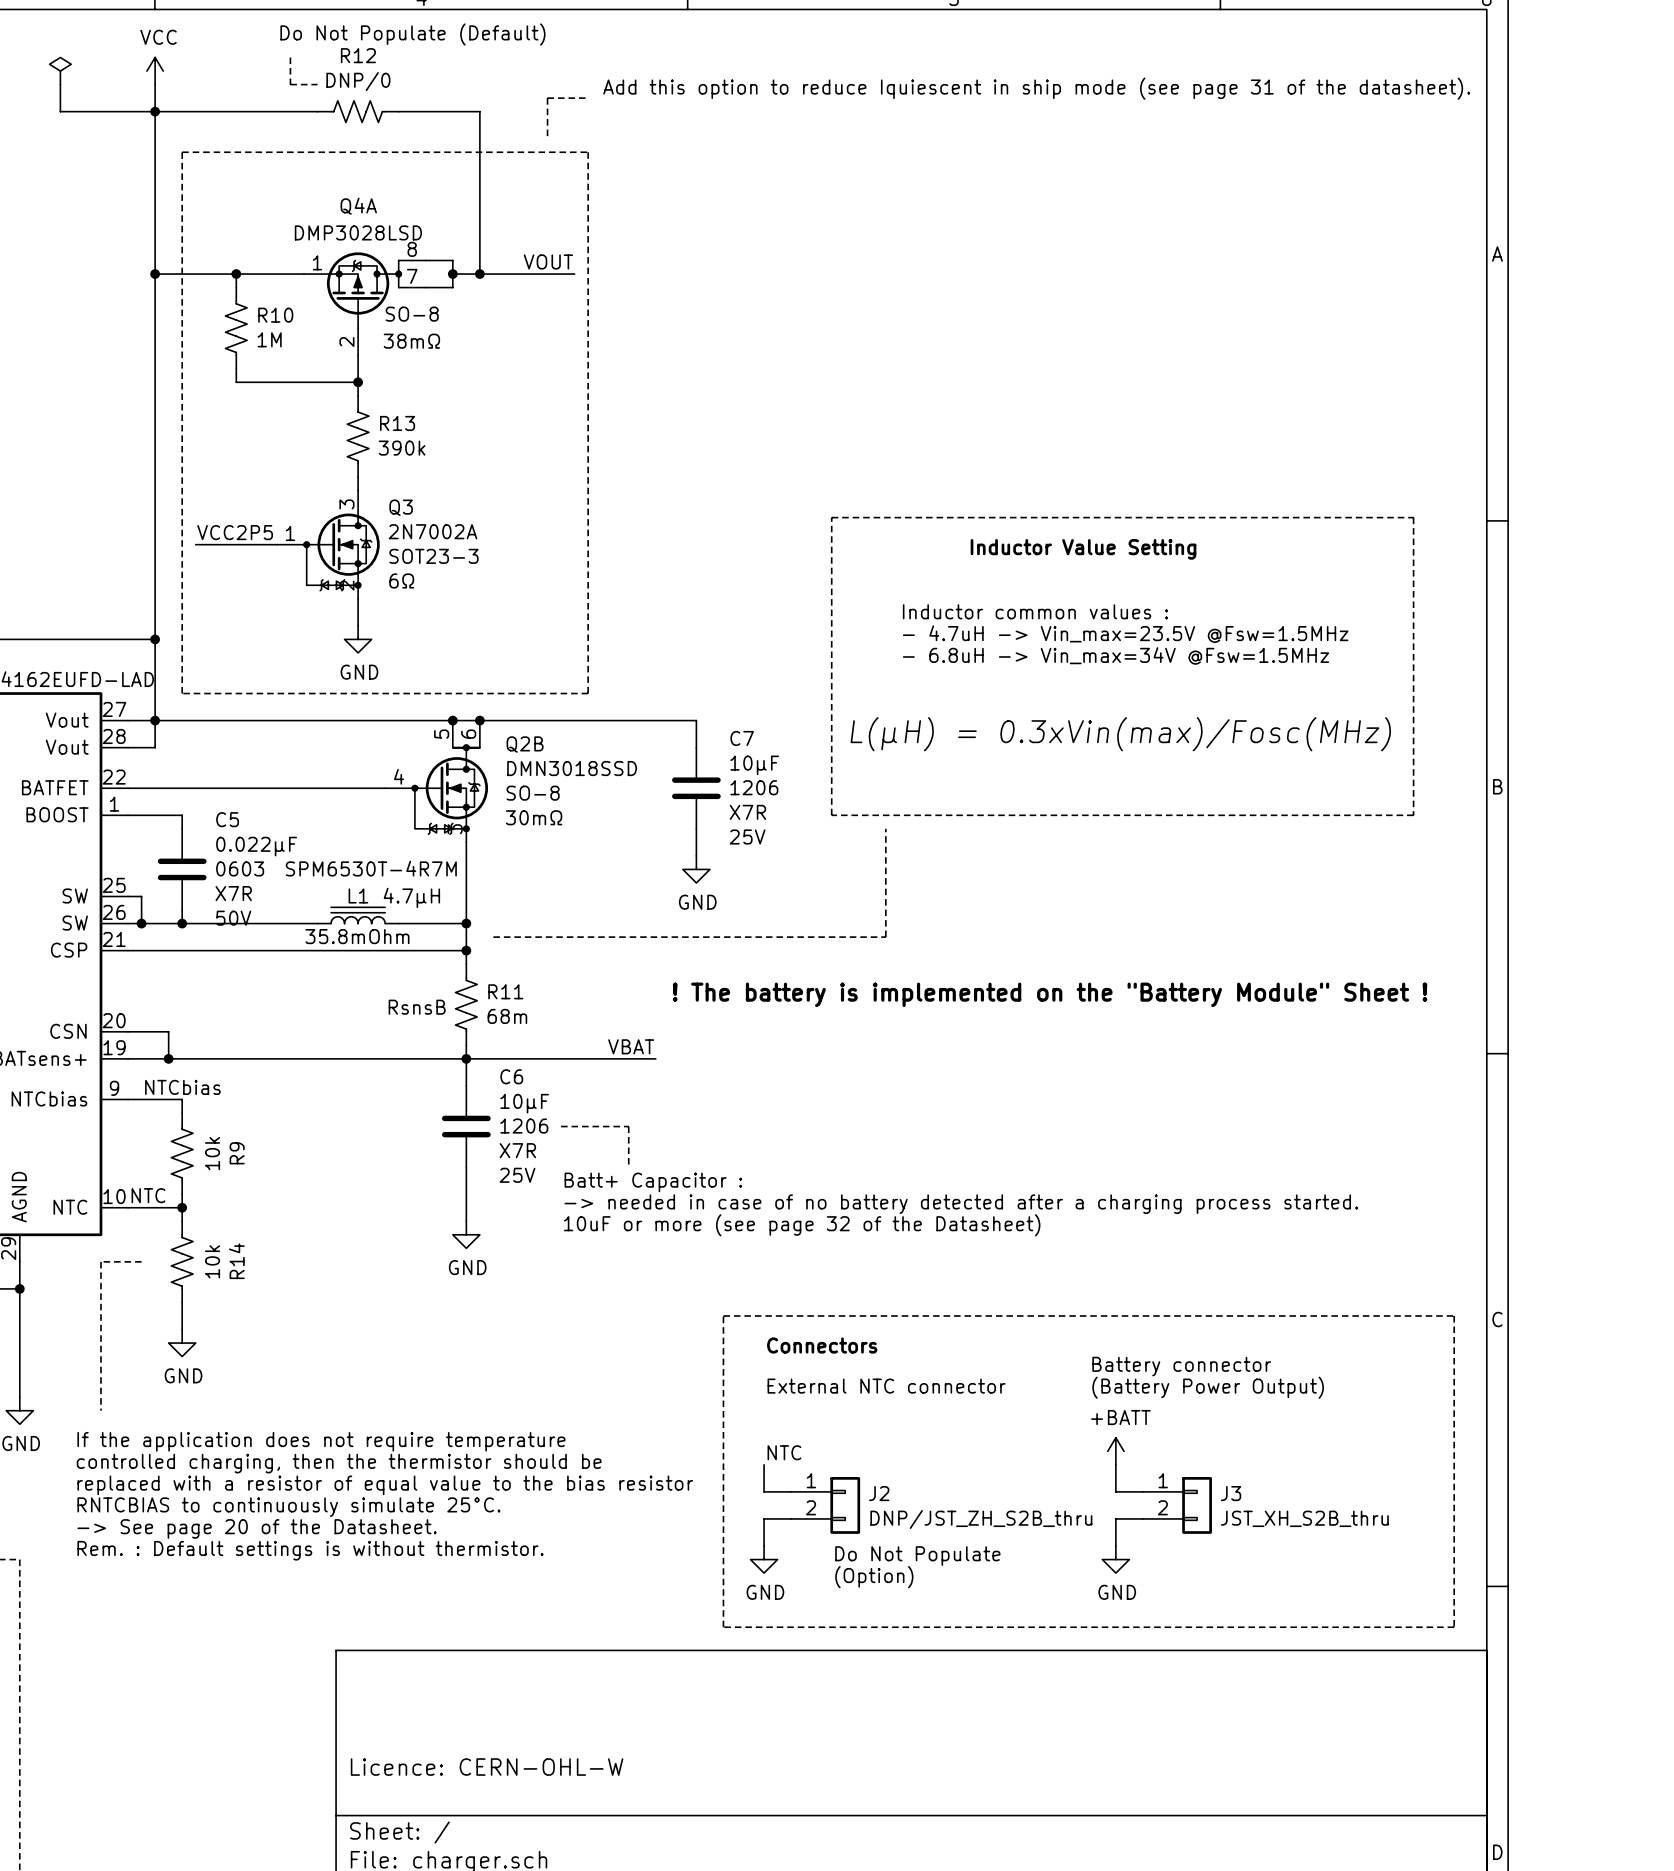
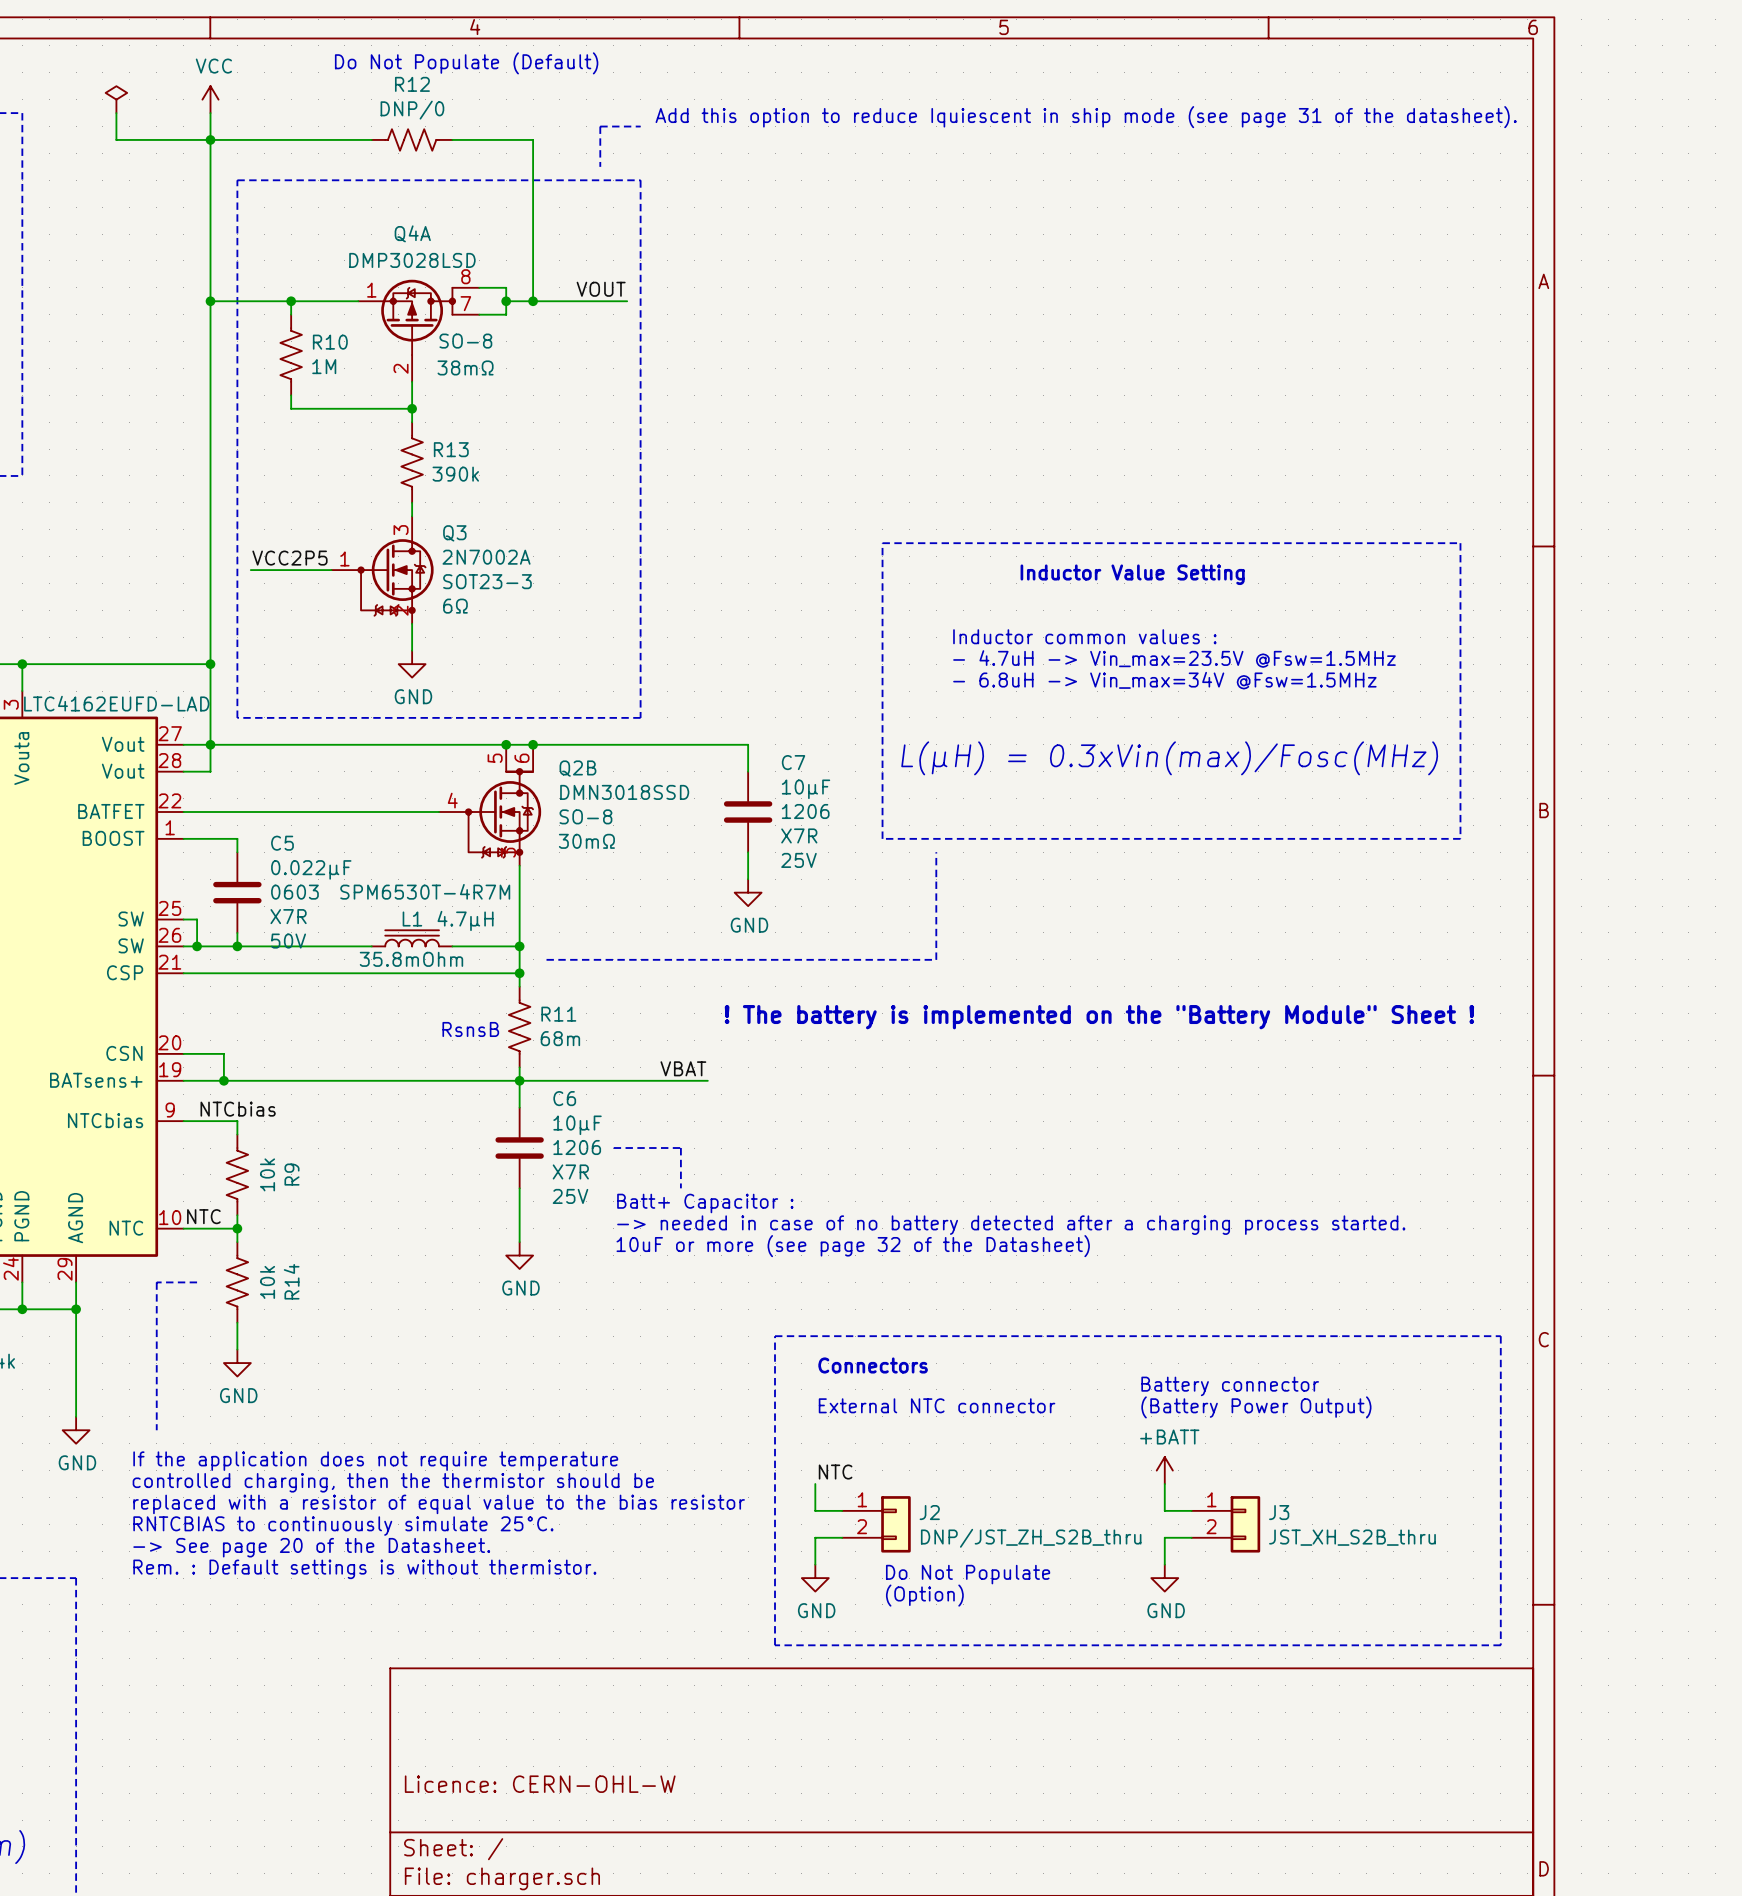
line: (290, 57) (290, 84) (317, 84) -> none

